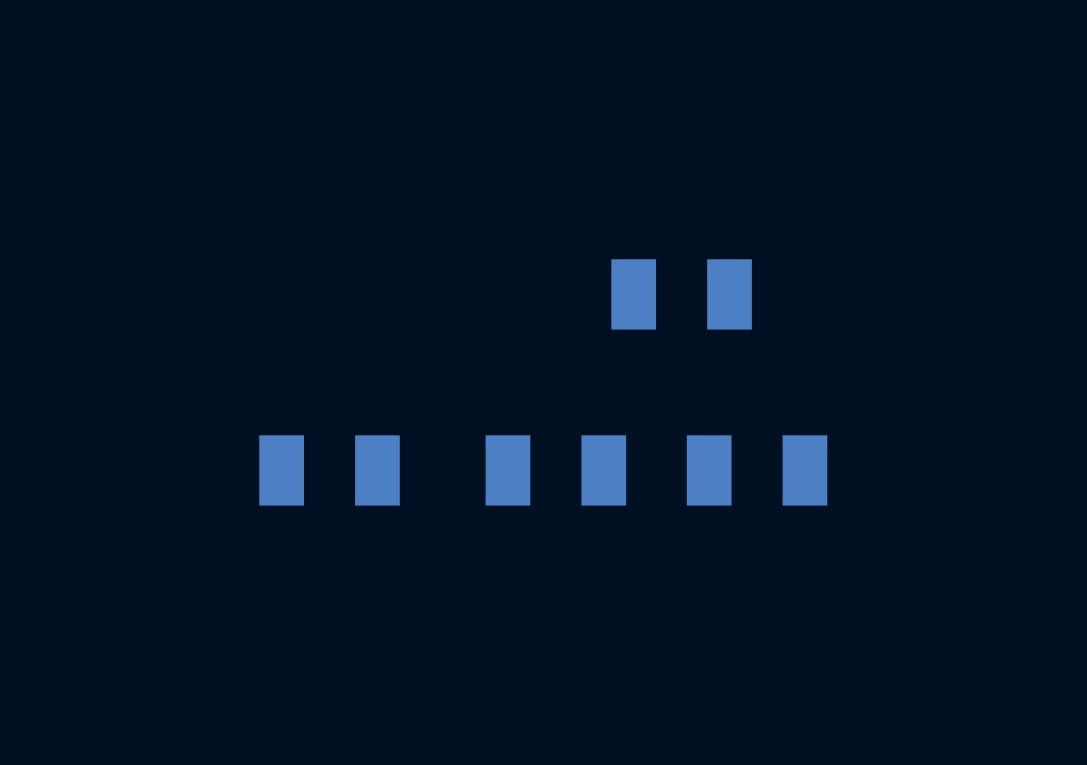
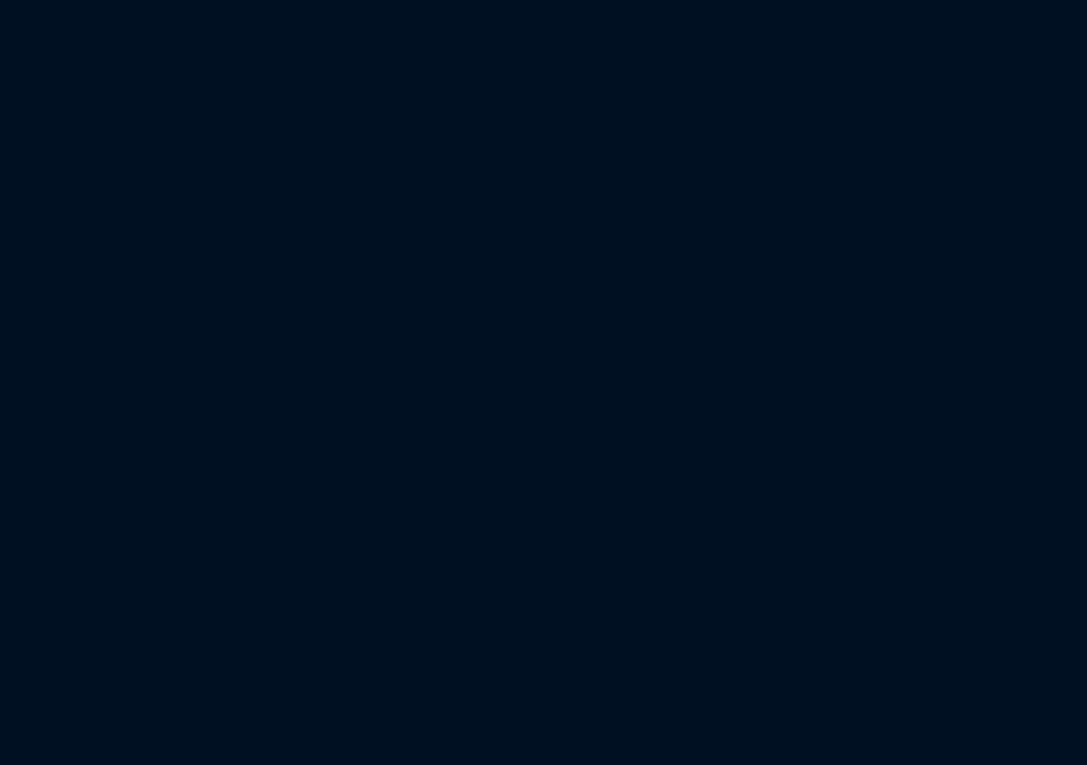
part: (681, 294) -> none
part: (329, 470) -> none
part: (555, 470) -> none
part: (757, 470) -> none

